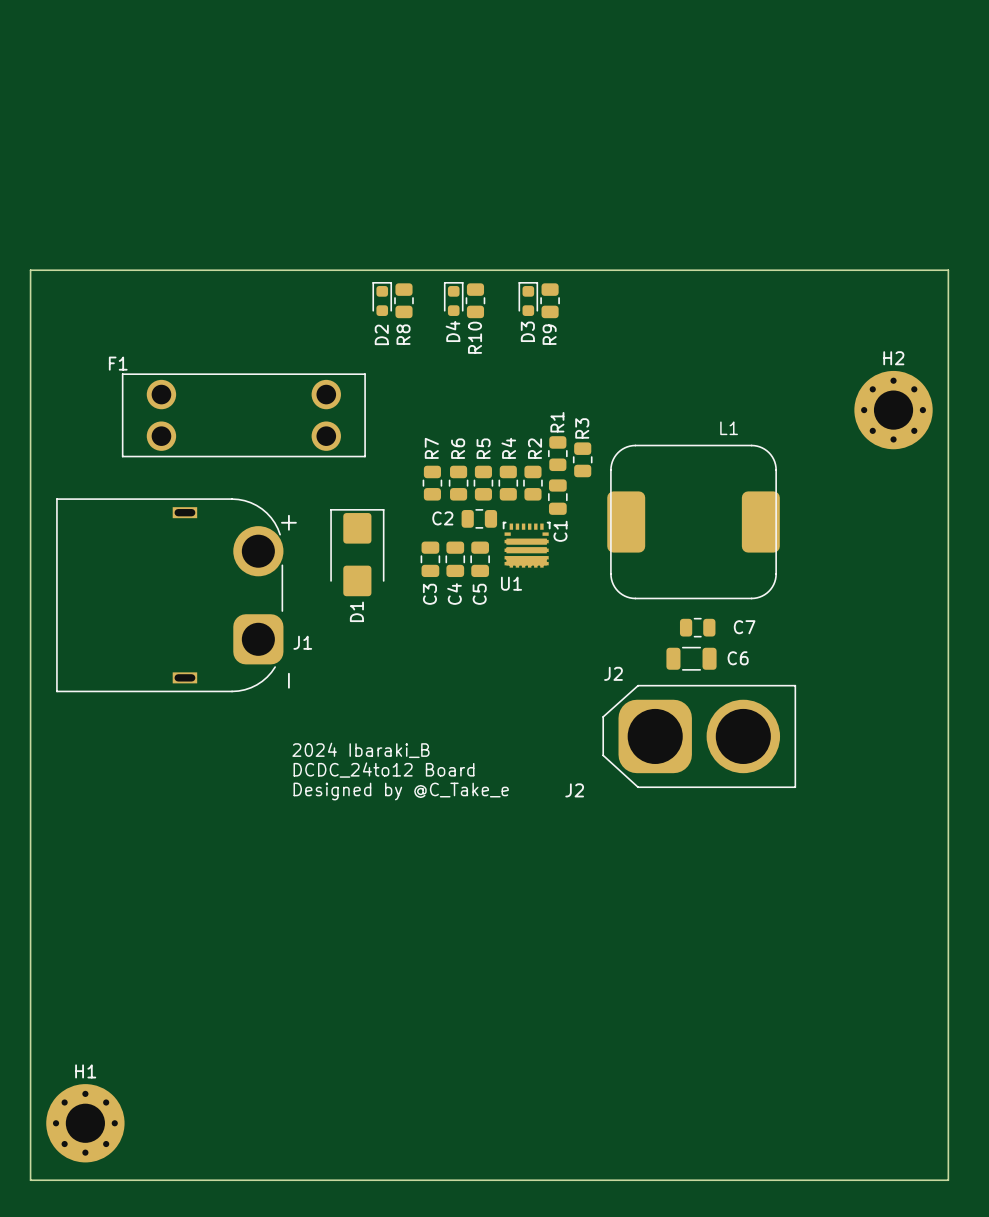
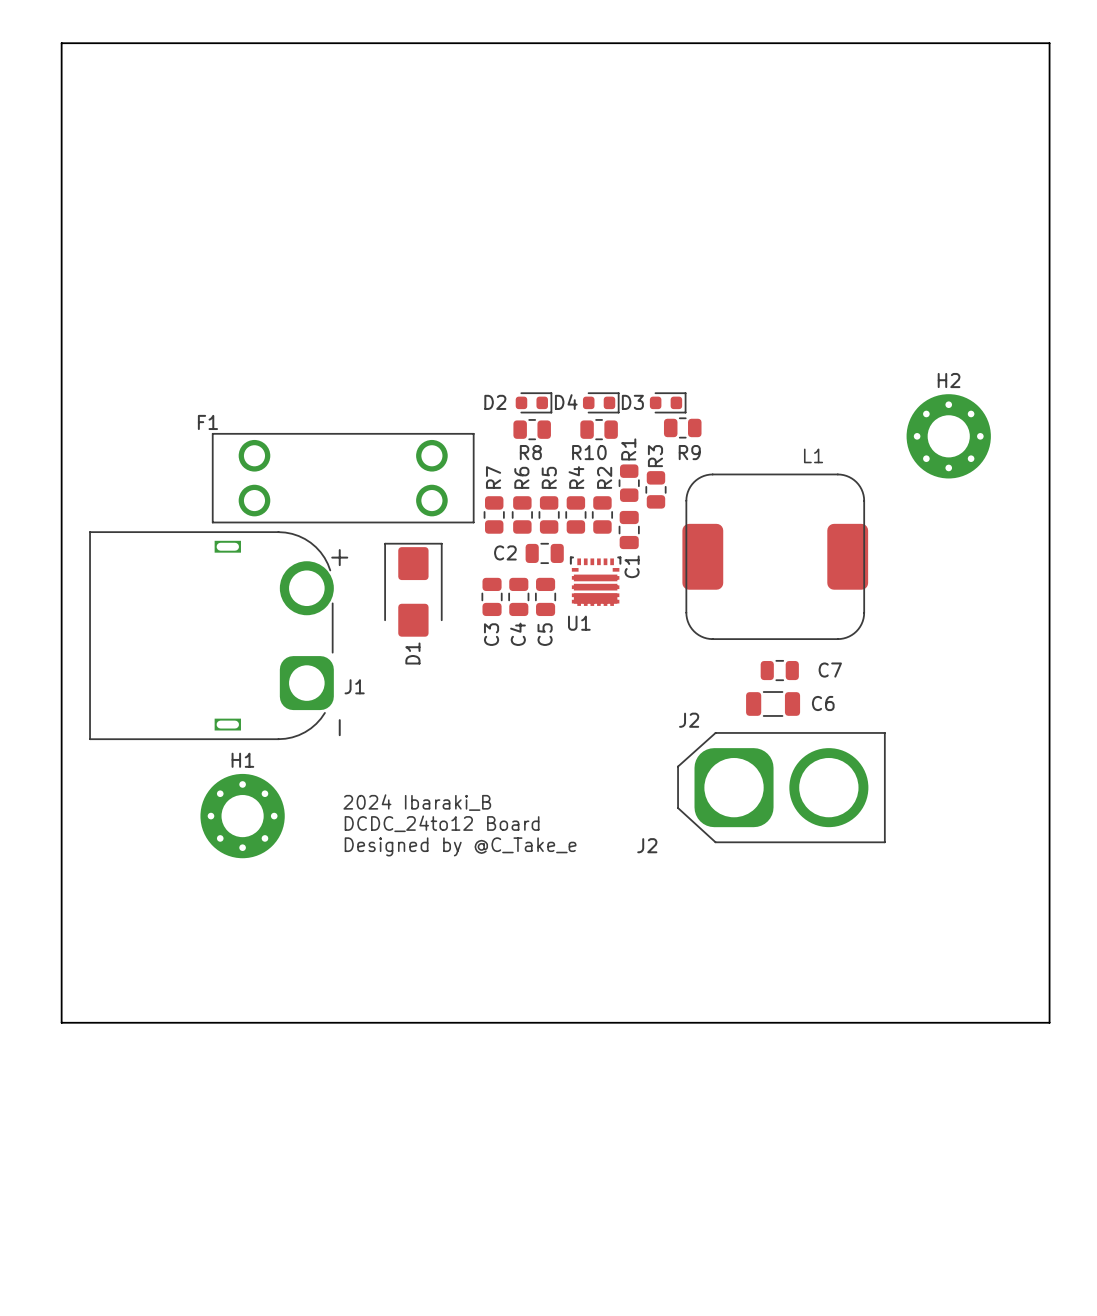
board edge: (30, 270) (948, 270) -> (61, 285) (61, 43) (1049, 43) (1049, 285)
D2 rotation: 0° (382, 299) -> 90° clockwise (533, 402)
D2 position: (382, 299) -> (533, 402)
D4 rotation: 0° (453, 299) -> 90° clockwise (601, 402)
D4 position: (453, 299) -> (601, 402)
D3 rotation: 0° (528, 299) -> 90° clockwise (668, 402)
D3 position: (528, 299) -> (668, 402)
R8 rotation: 0° (403, 300) -> 90° clockwise (532, 429)
R8 position: (403, 300) -> (532, 429)
R10 rotation: 0° (475, 300) -> 90° clockwise (599, 429)
R10 position: (475, 300) -> (599, 429)
R9 rotation: 0° (550, 300) -> 90° clockwise (682, 427)
R9 position: (550, 300) -> (682, 427)
H2 position: (893, 410) -> (948, 436)
F1 position: (243, 415) -> (343, 478)
board edge: (30, 954) (30, 1180) (948, 1180) (948, 954) -> (61, 1022) (1049, 1022)
H1 position: (85, 1123) -> (242, 816)

